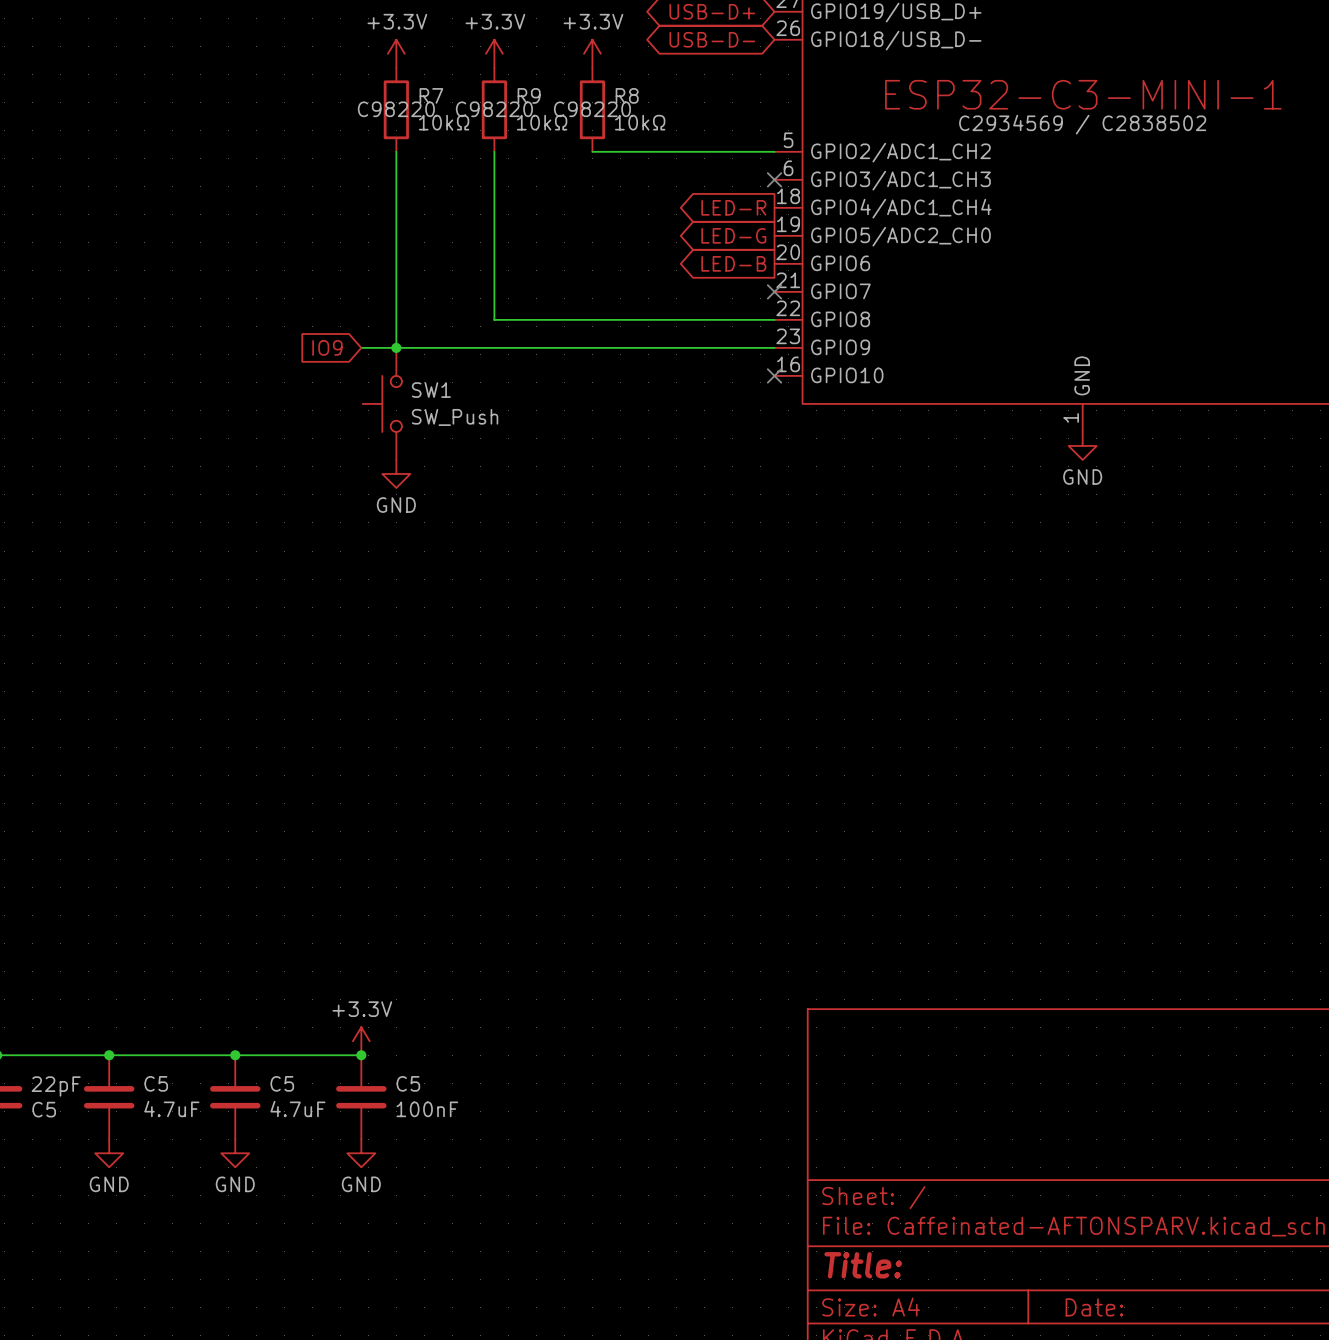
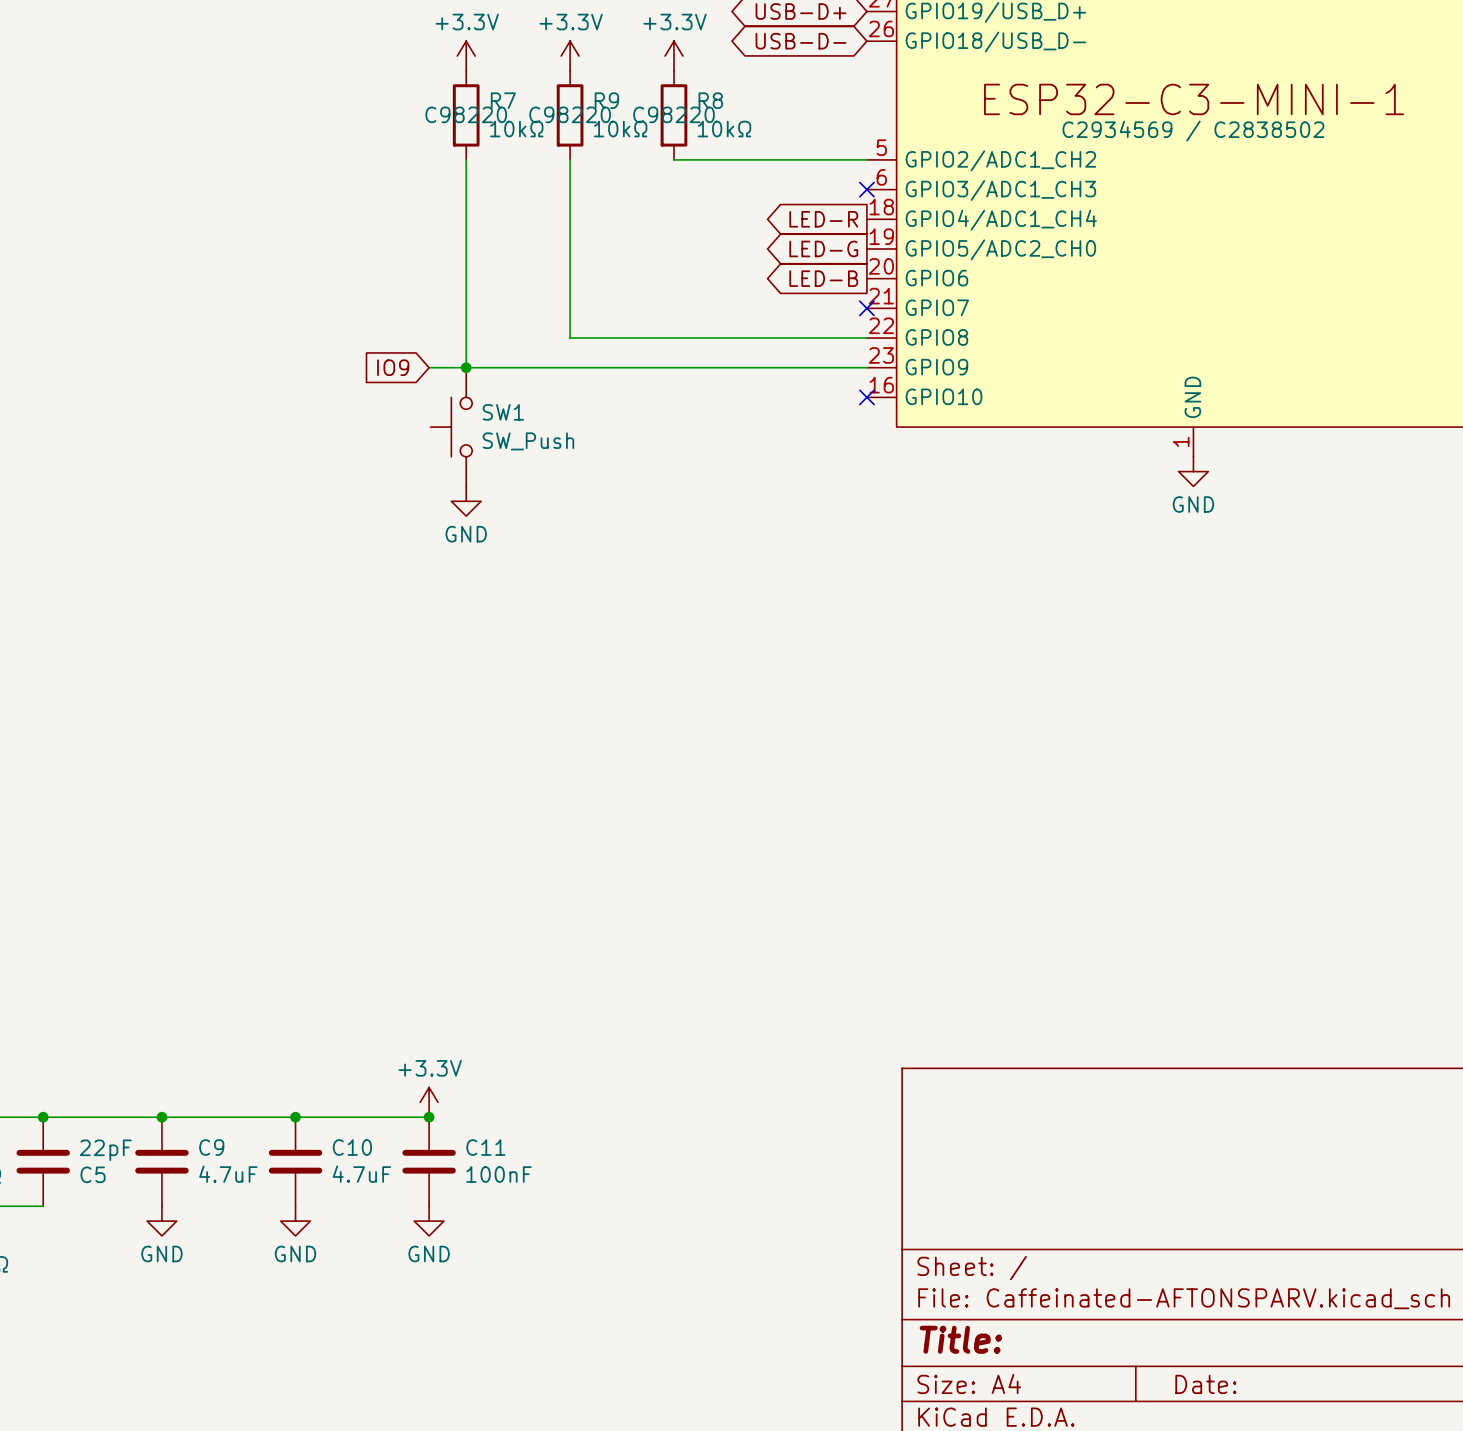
C5 name: C5 (156, 1083) -> C9 (211, 1147)
C5 name: C5 (282, 1083) -> C10 (352, 1147)
C5 name: C5 (408, 1083) -> C11 (485, 1147)

